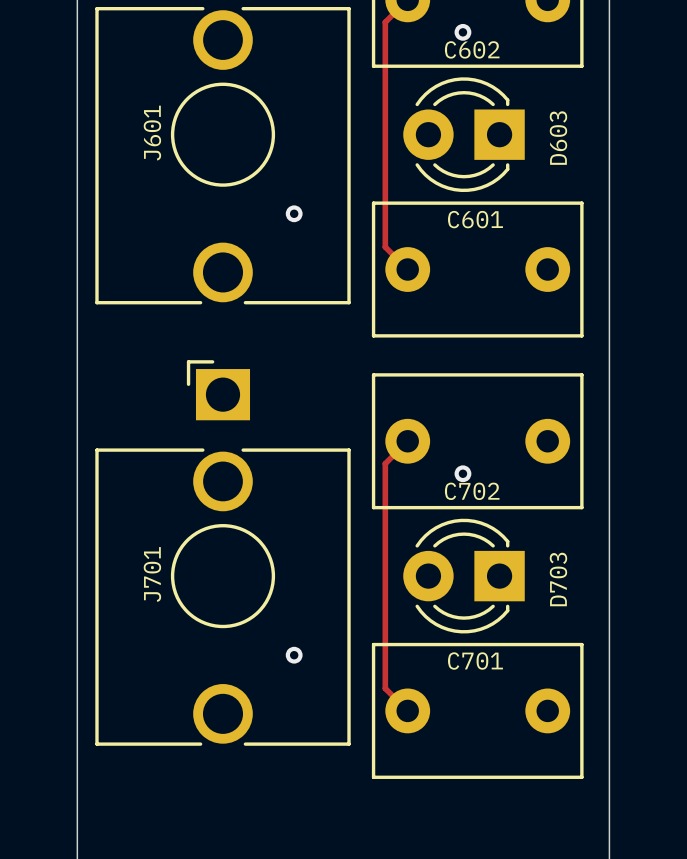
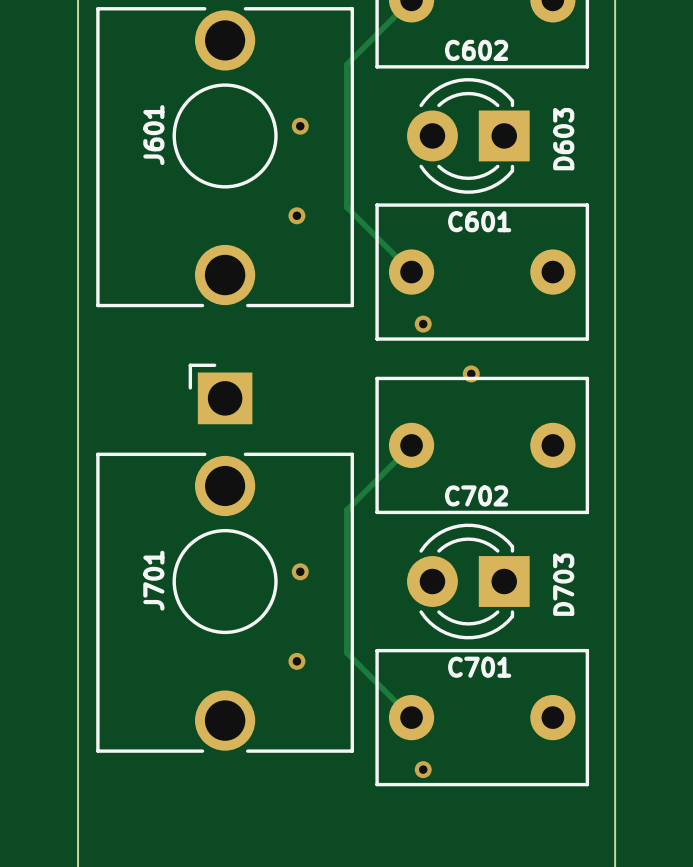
track: (385, 22) (385, 247) -> (388, 22) (346, 64) (346, 207) (388, 249)
via: (462, 32) -> none
via: none -> (300, 126)
via: none -> (423, 324)
via: none -> (471, 373)
track: (385, 463) (385, 688) -> (388, 468) (346, 510) (346, 652) (388, 694)
via: (462, 473) -> none
via: none -> (300, 571)
via: none -> (423, 769)

